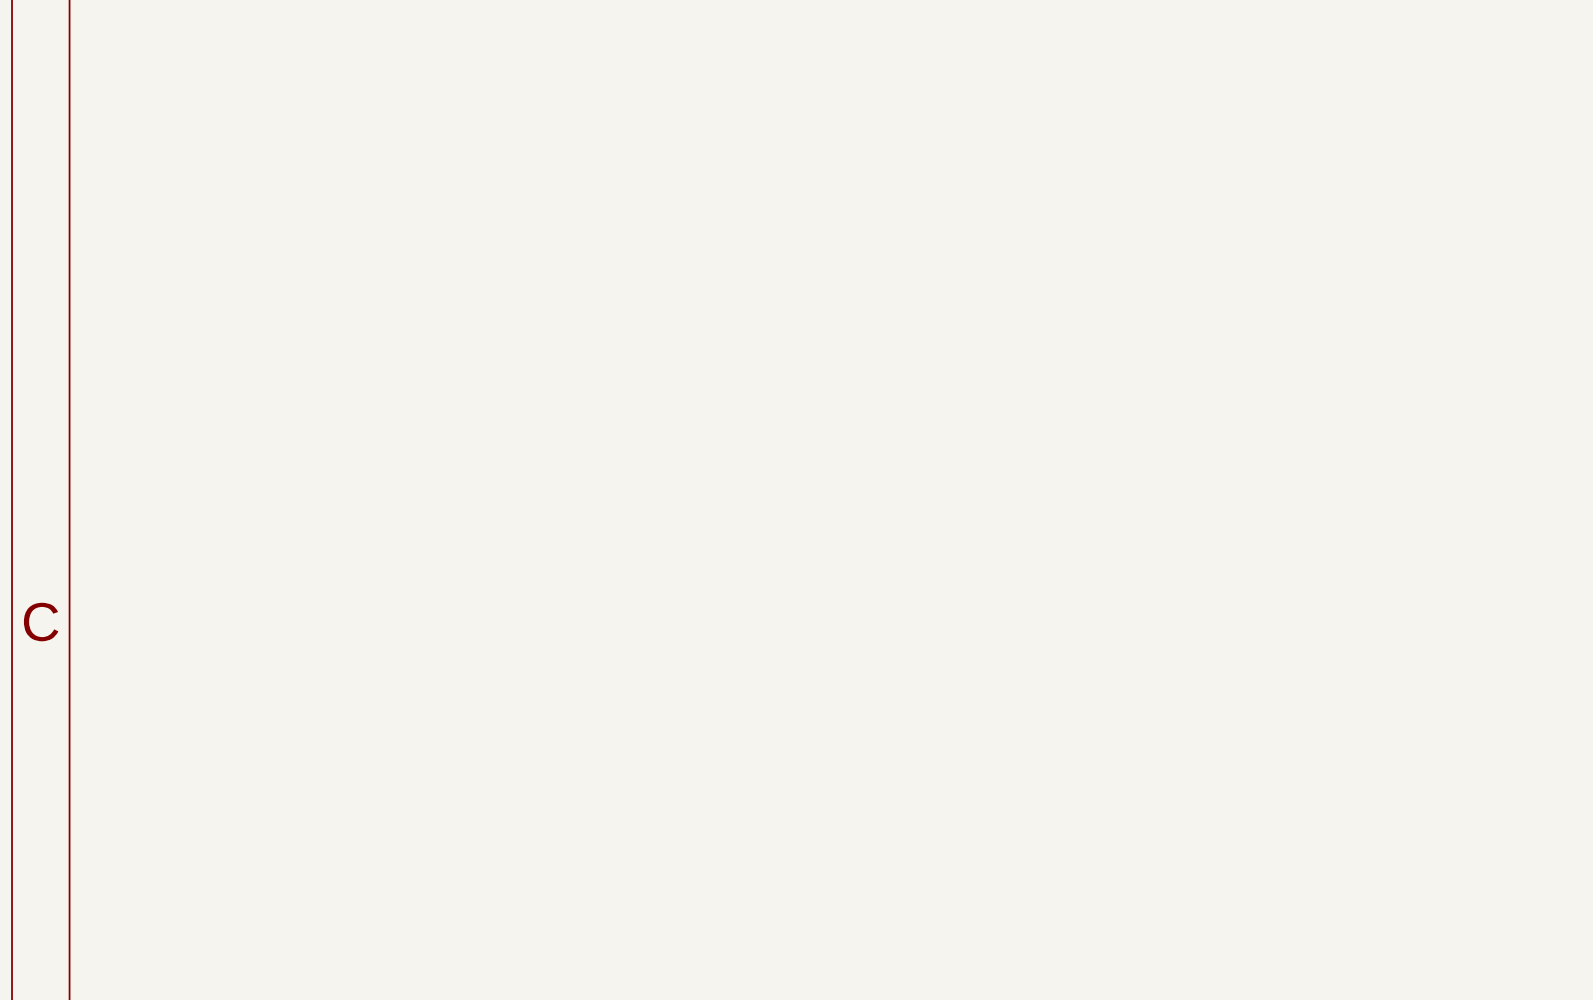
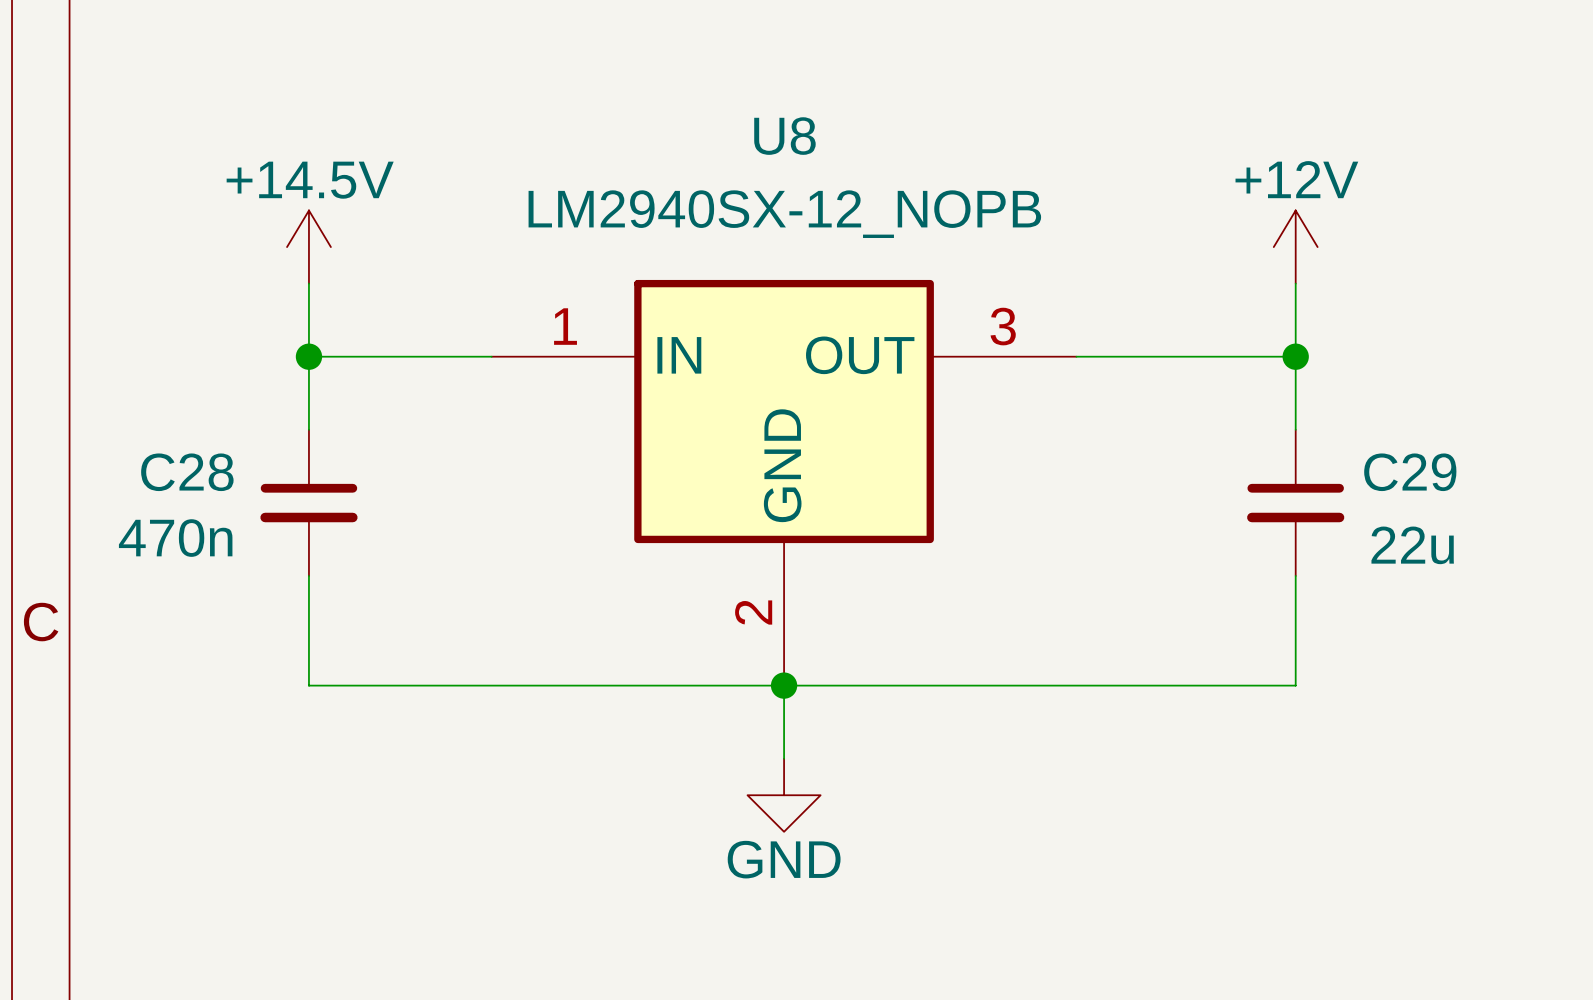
power symbol: none -> +14.5V (308, 247)
power symbol: none -> +12V (1295, 247)
wire: none -> (308, 283) (308, 429)
wire: none -> (1295, 283) (1295, 429)
wire: none -> (308, 356) (491, 356)
junction: none -> (308, 356)
wire: none -> (1076, 356) (1295, 356)
junction: none -> (1295, 356)
U8: none -> LM2940SX-12_NOPB (784, 482)
C28: none -> 470n (308, 502)
C29: none -> 22u (1295, 502)
wire: none -> (308, 575) (308, 685) (1295, 685) (1295, 575)
wire: none -> (784, 685) (784, 758)
junction: none -> (784, 685)
power symbol: none -> GND (784, 795)

